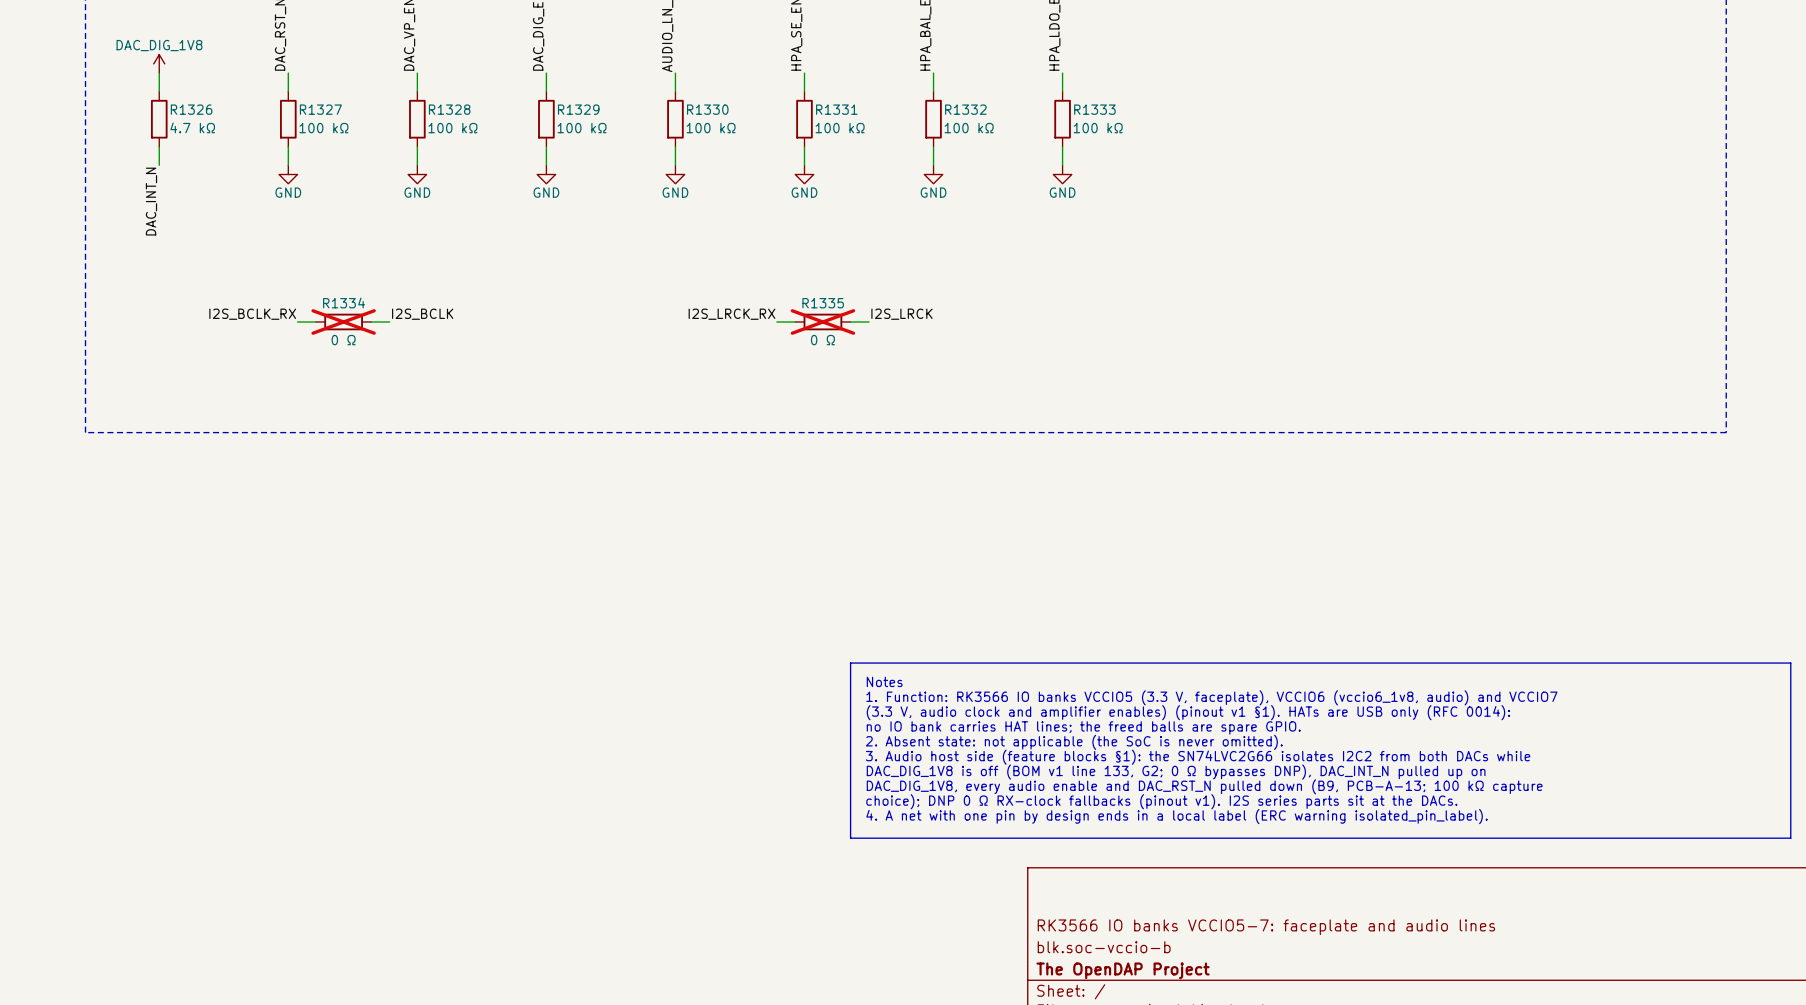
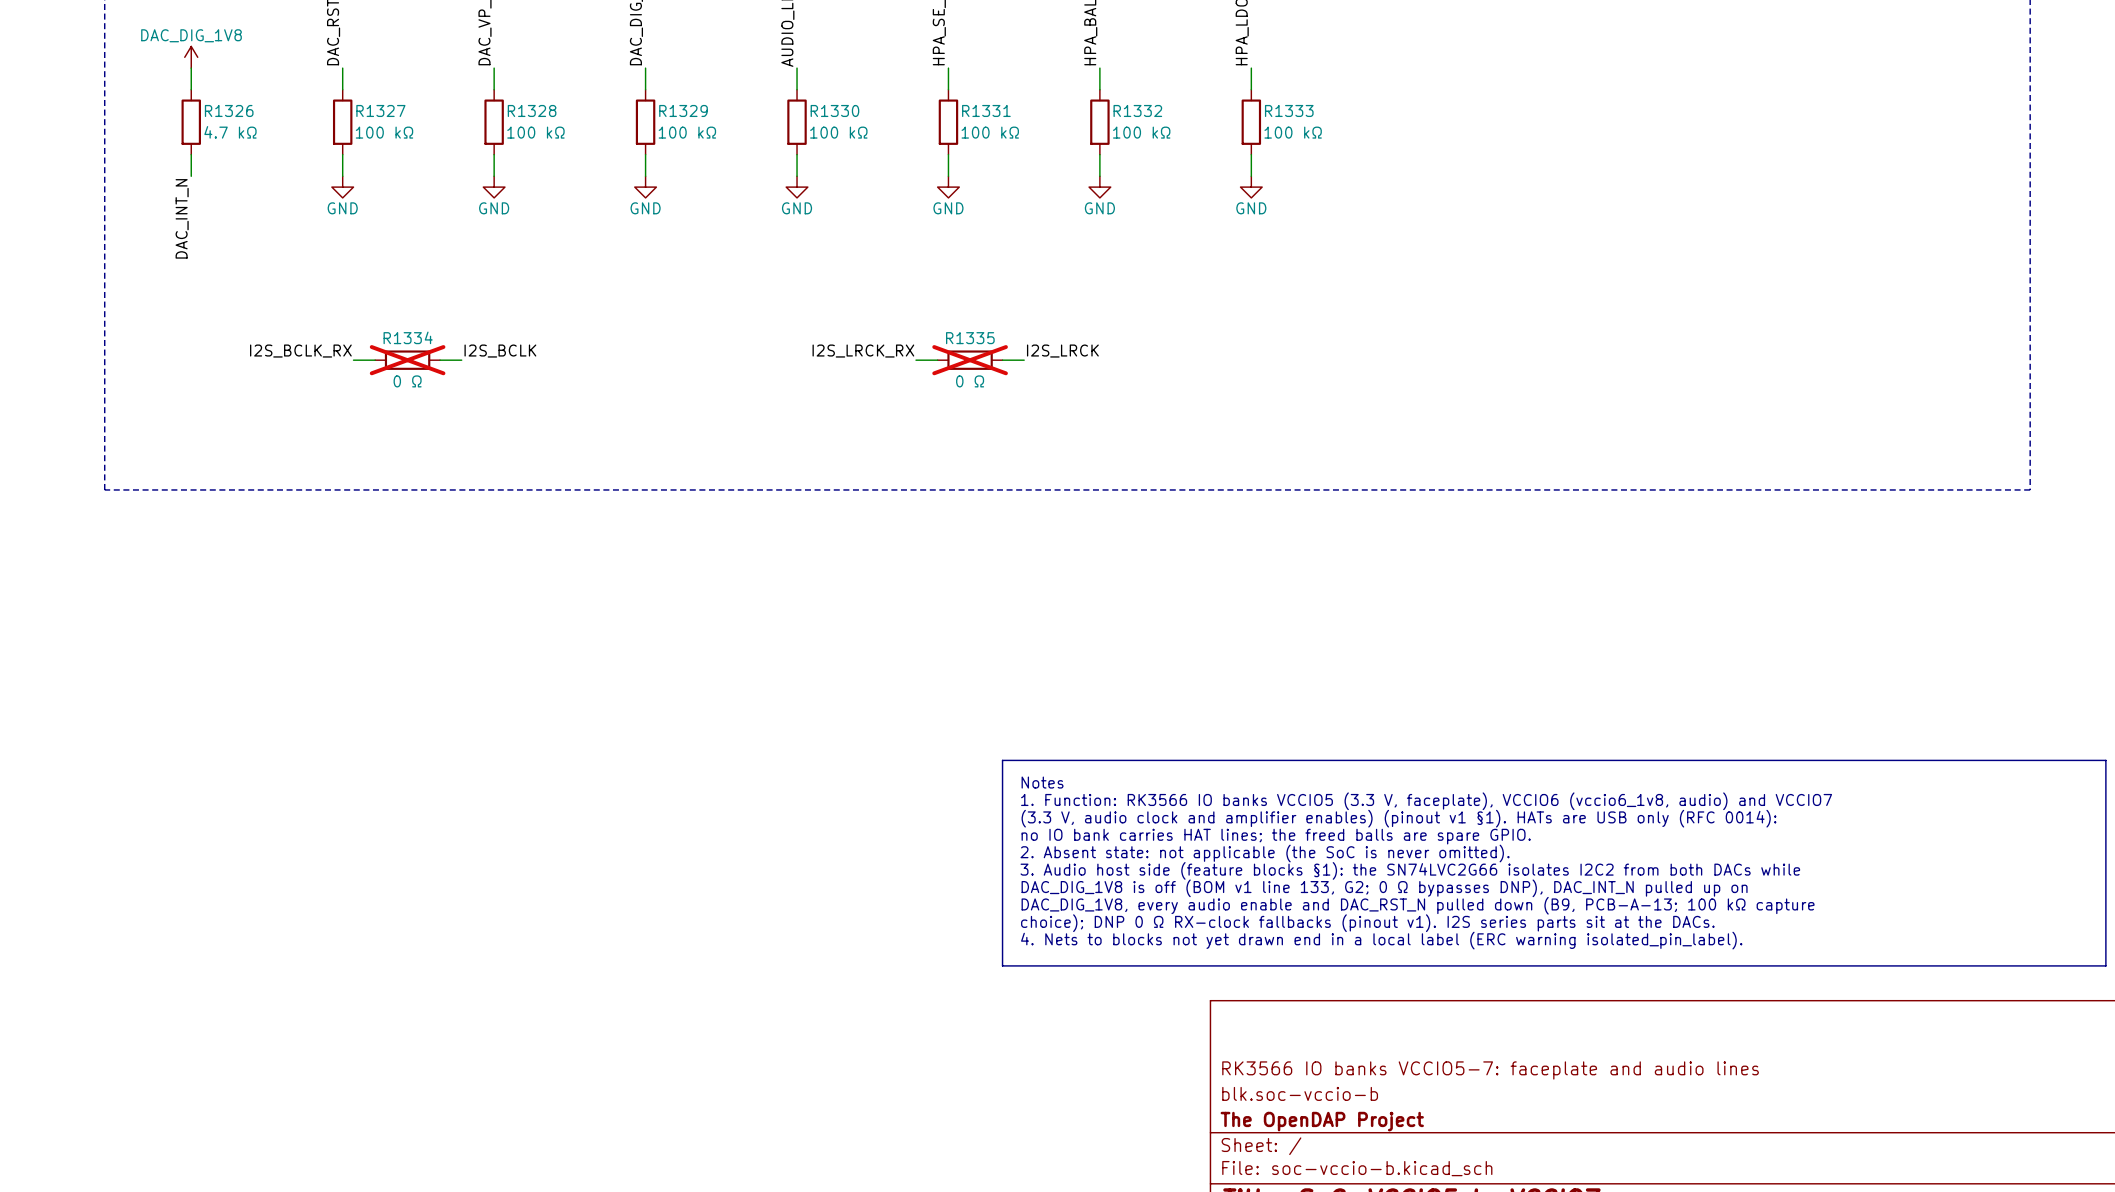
text: 4. A net with one pin by design ends in a local label (ERC warning isolated_pin_label). (1176, 816) -> 4. Nets to blocks not yet drawn end in a local label (ERC warning isolated_pin_label). (1381, 940)

